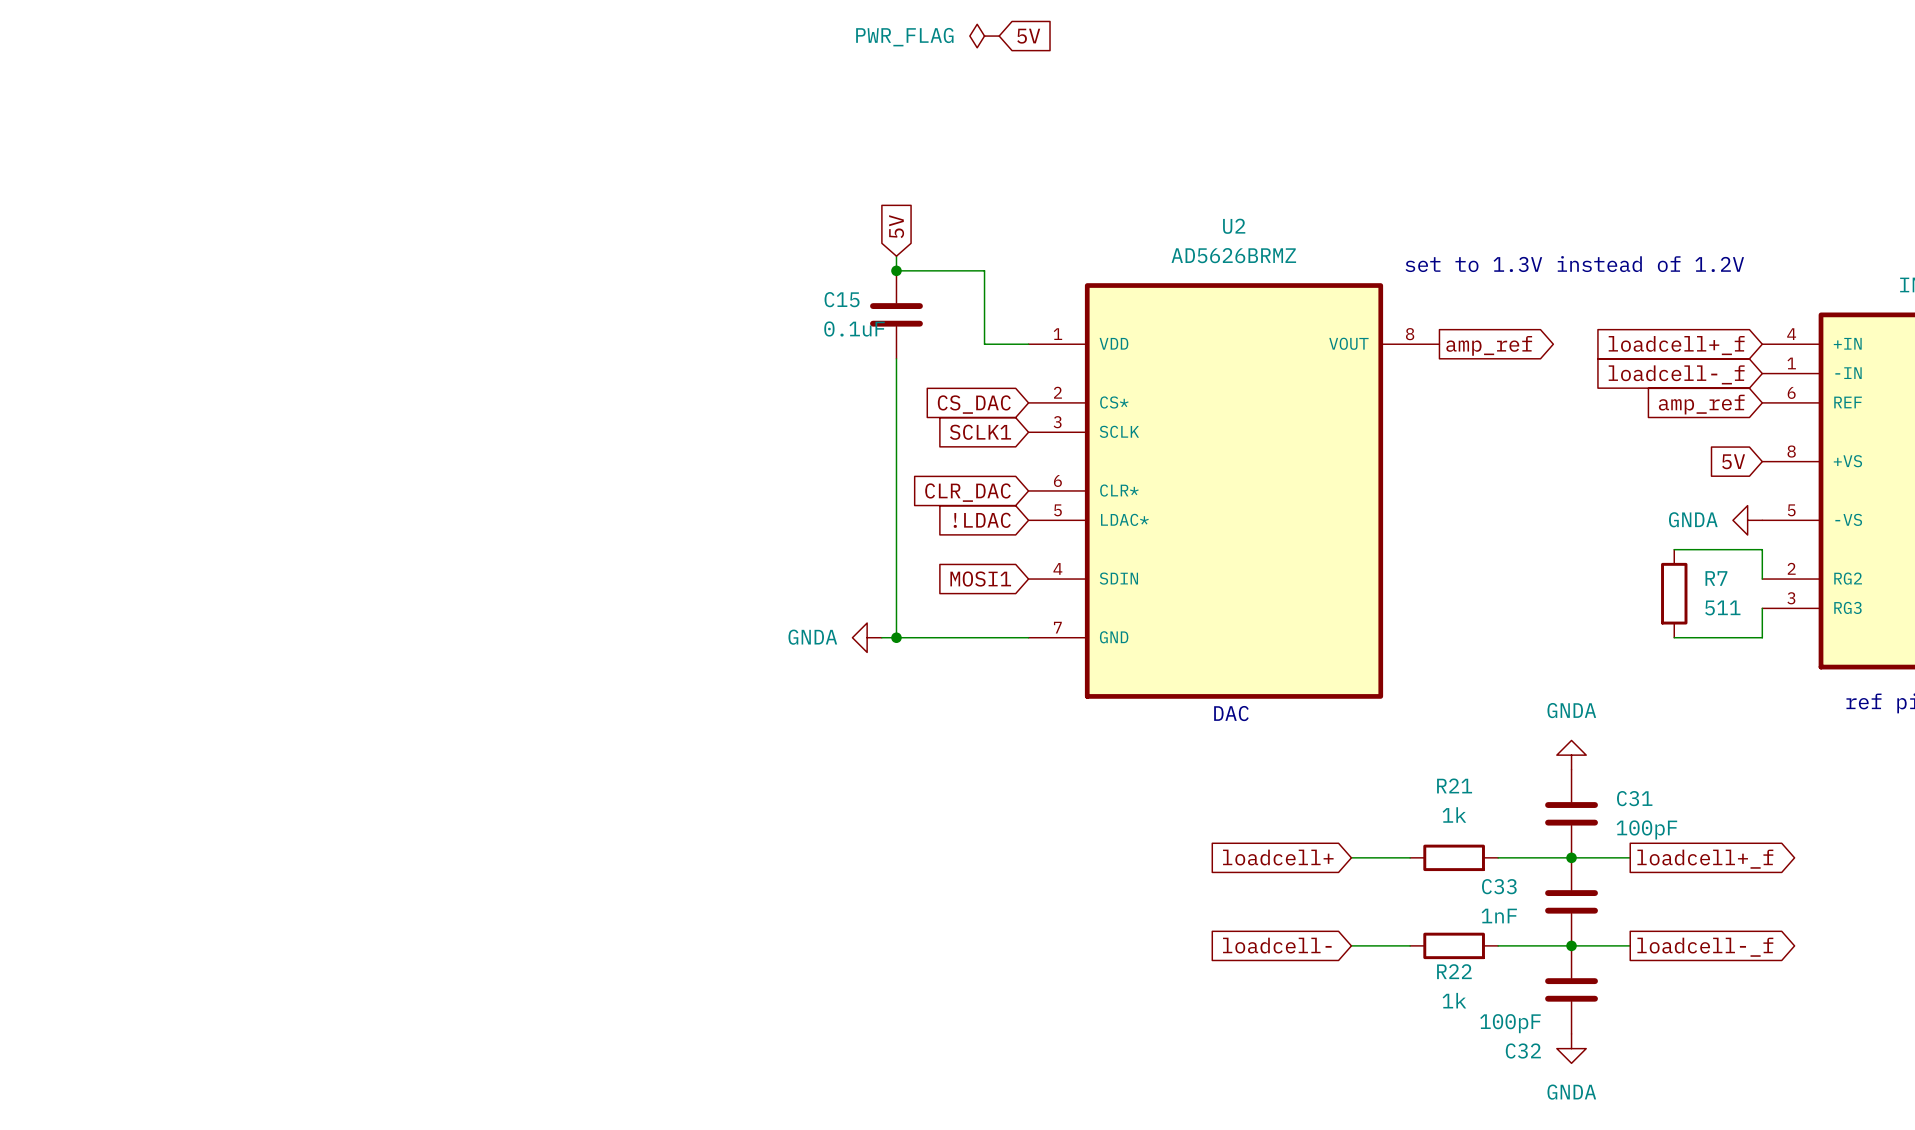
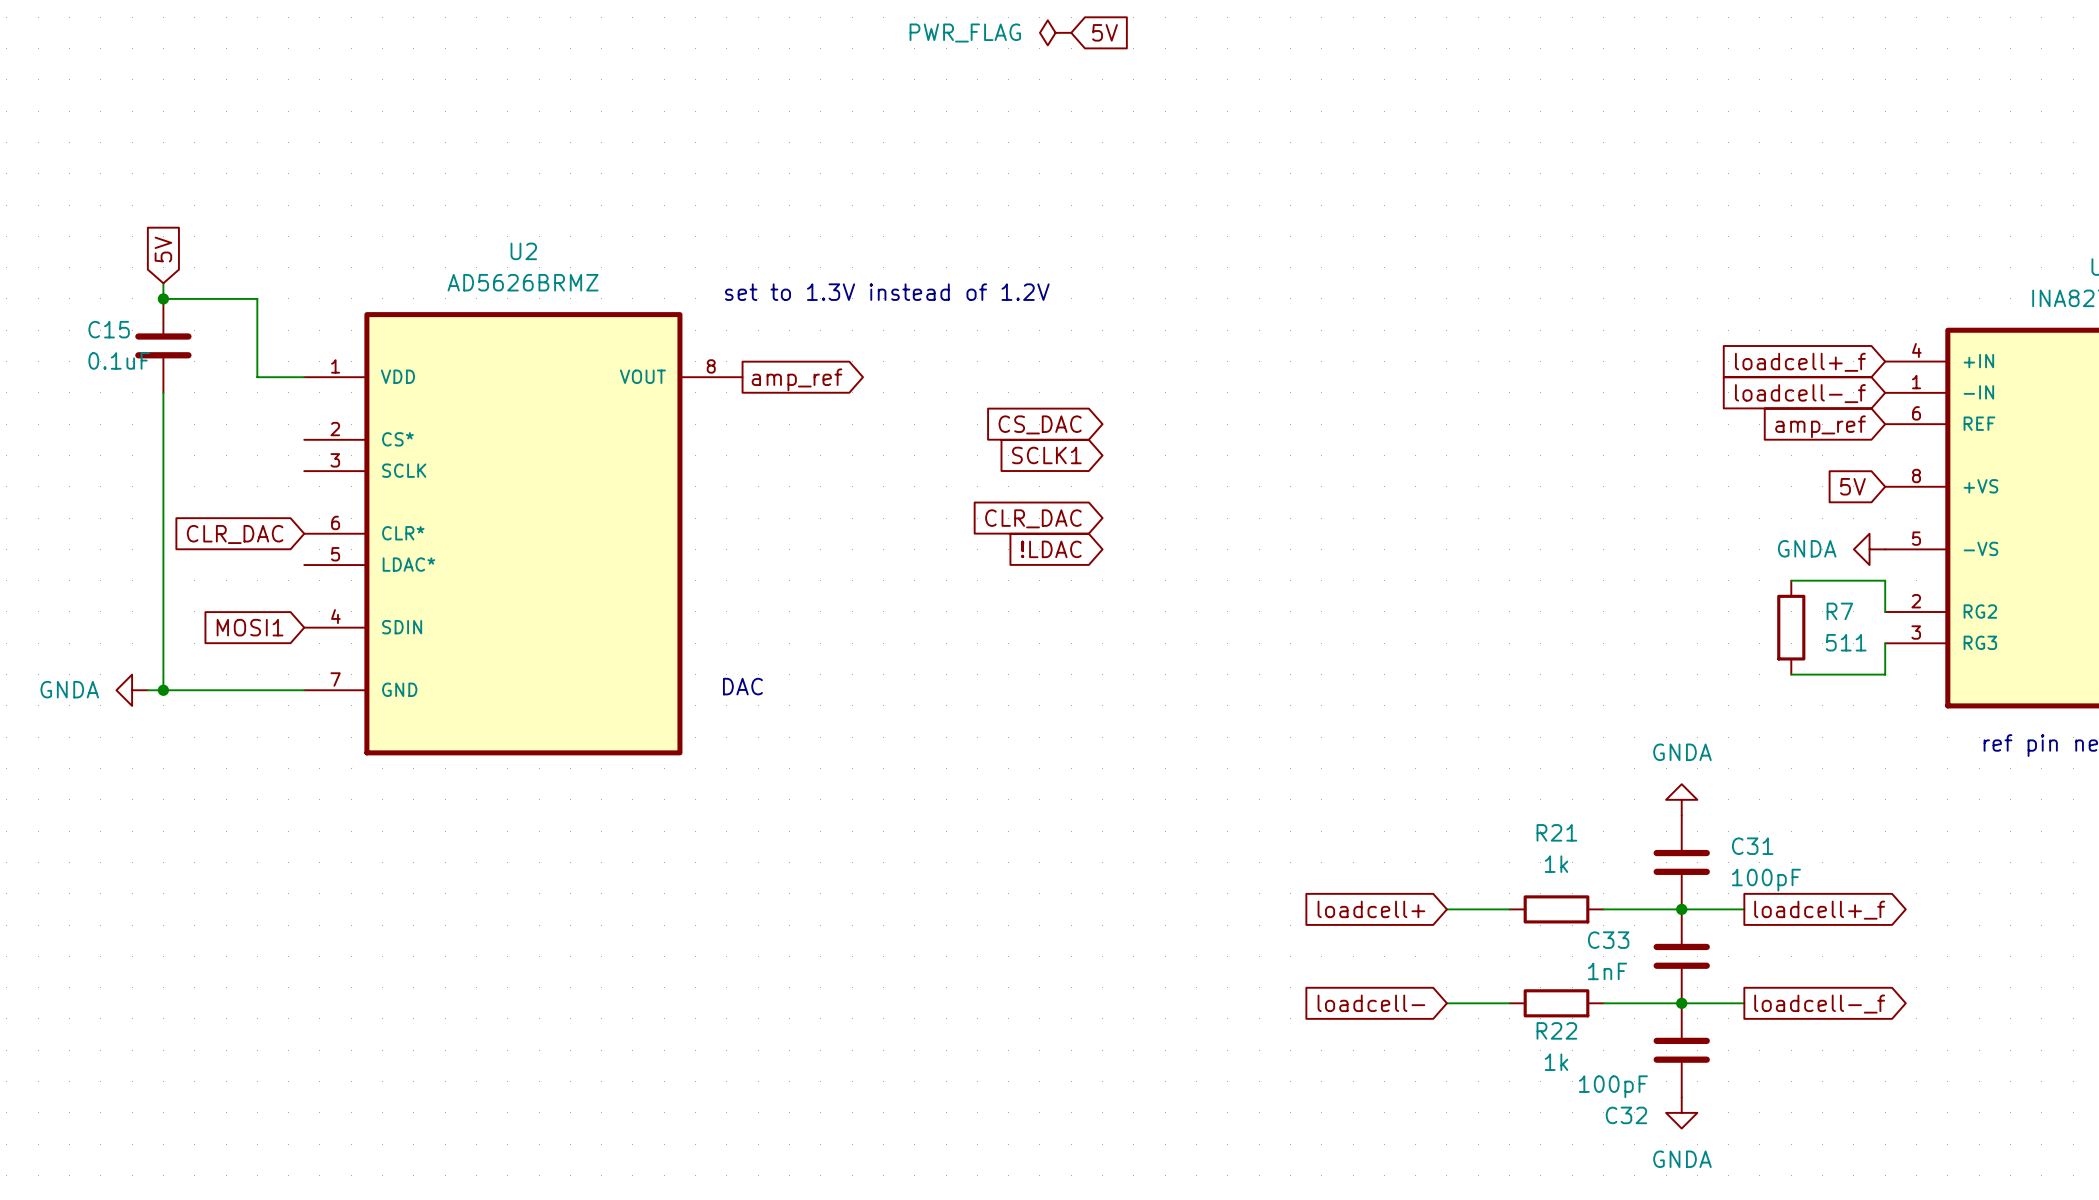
global label: 5V (896, 226) -> none
global label: none -> 5V (163, 249)
wire: (896, 256) (896, 270) (984, 270) (984, 344) (1028, 344) -> none
text: set to 1.3V instead of 1.2V (1574, 264) -> none
wire: none -> (163, 283) (163, 298) (257, 298) (257, 377) (304, 377)
junction: (896, 270) -> none
text: none -> set to 1.3V instead of 1.2V (887, 292)
junction: none -> (163, 298)
C15 position: (896, 314) -> (163, 345)
global label: amp_ref (1489, 345) -> none
wire: (896, 358) (896, 637) -> none
global label: none -> amp_ref (796, 379)
wire: none -> (163, 392) (163, 690)
U2 position: (1234, 490) -> (523, 533)
global label: none -> CLR_DAC (235, 534)
global label: MOSI1 (980, 579) -> none
global label: none -> MOSI1 (250, 627)
power symbol: GNDA (867, 637) -> none
wire: (881, 637) (1028, 637) -> none
junction: (896, 637) -> none
text: none -> DAC (742, 686)
power symbol: none -> GNDA (132, 690)
wire: none -> (147, 690) (304, 690)
junction: none -> (163, 690)
text: DAC (1231, 713) -> none

